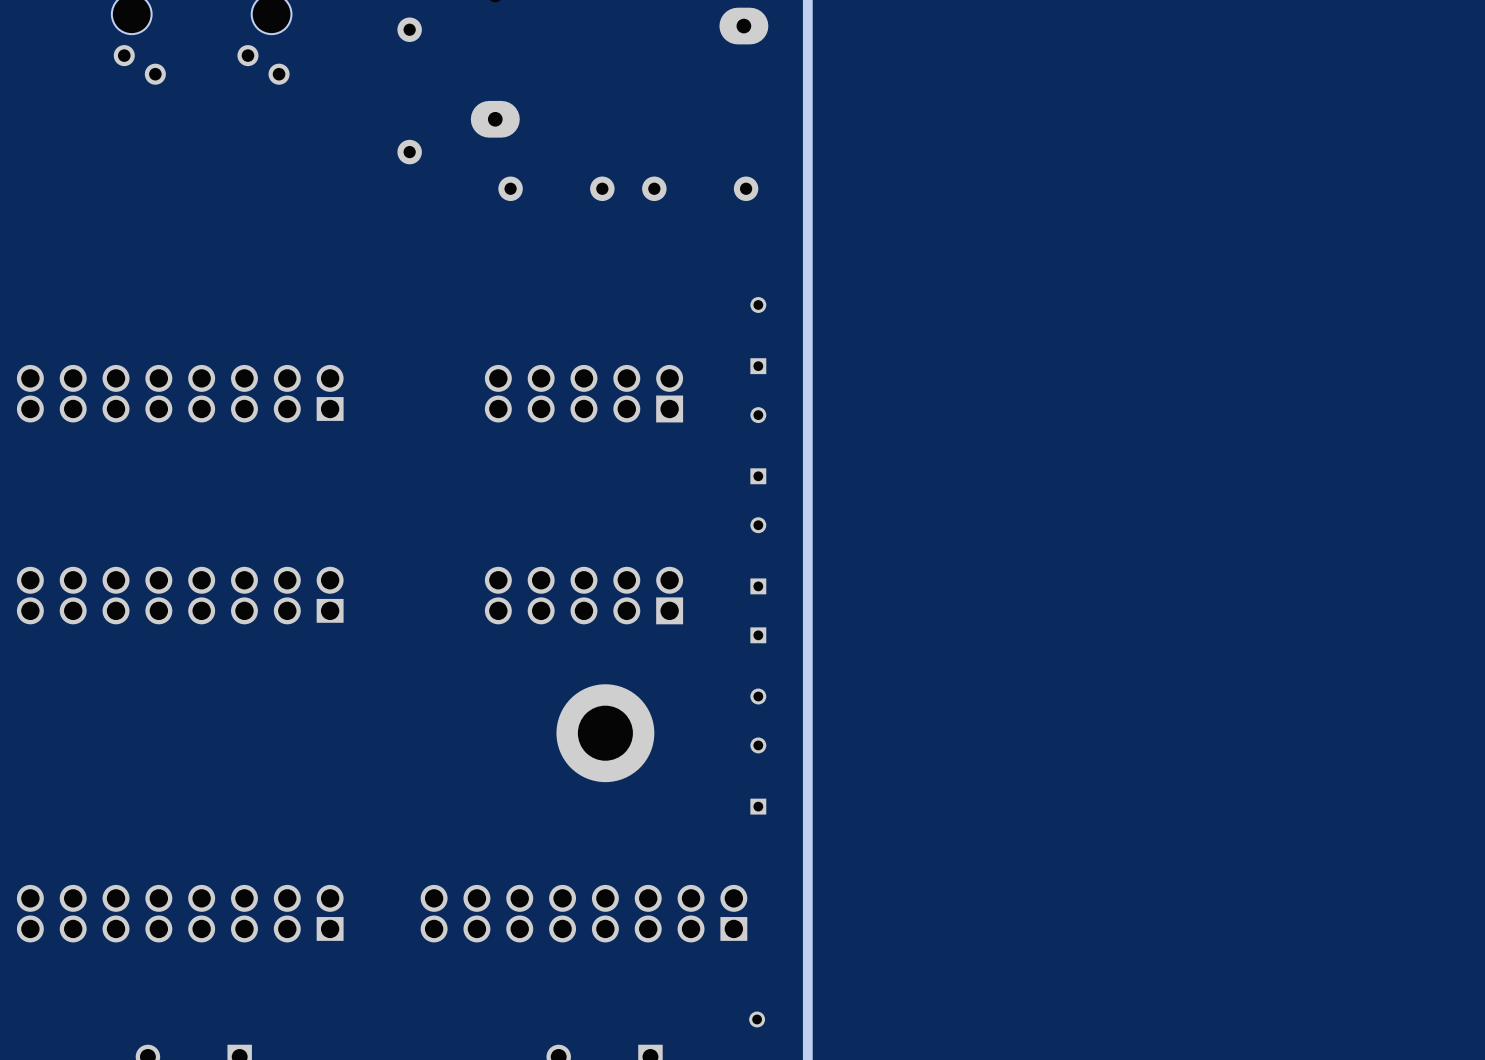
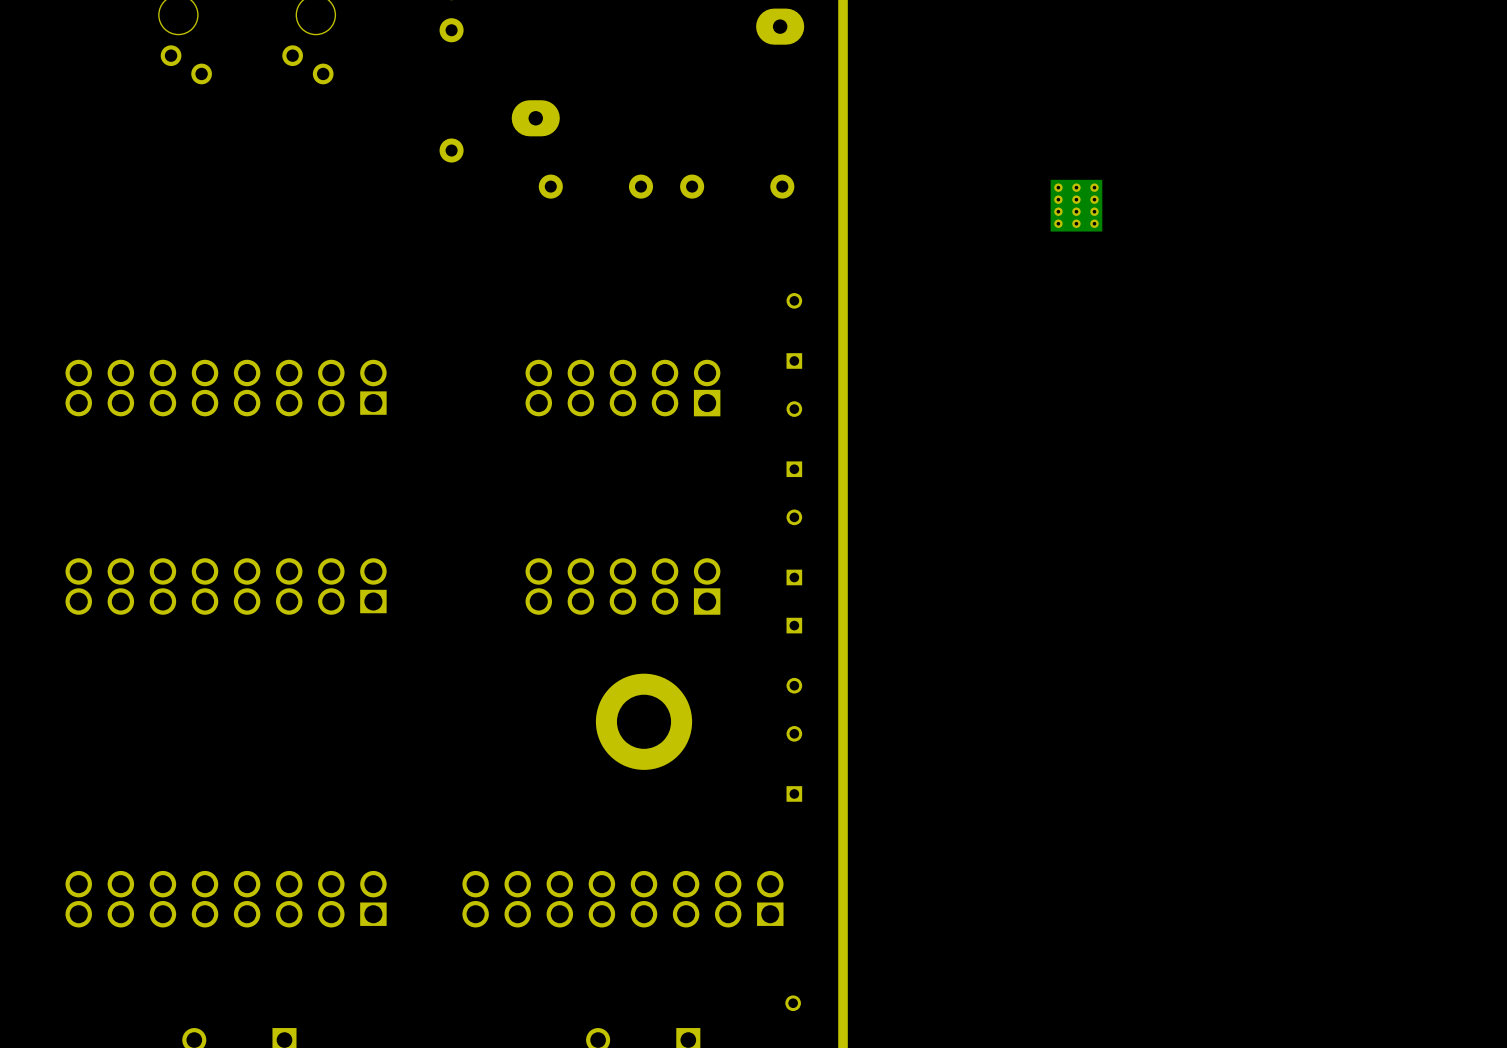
part: none -> (1076, 205)

